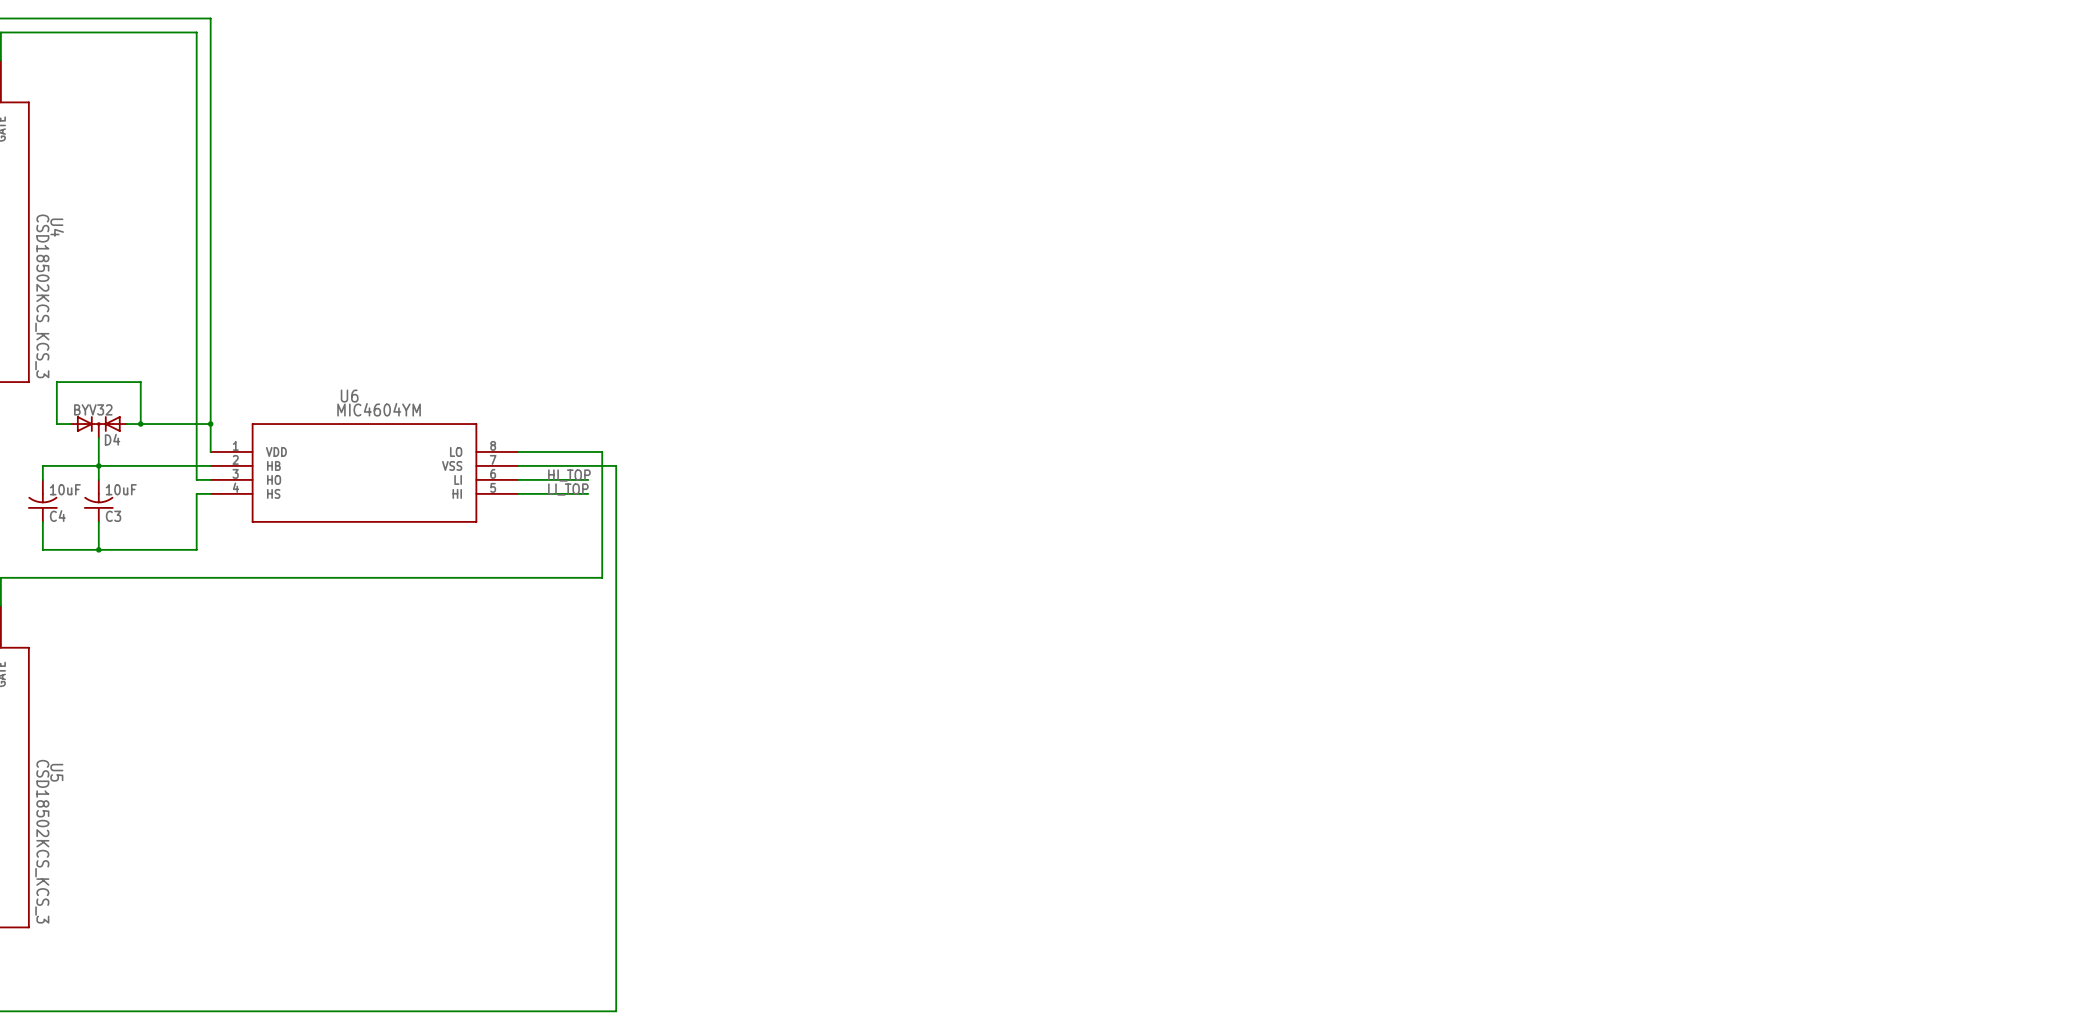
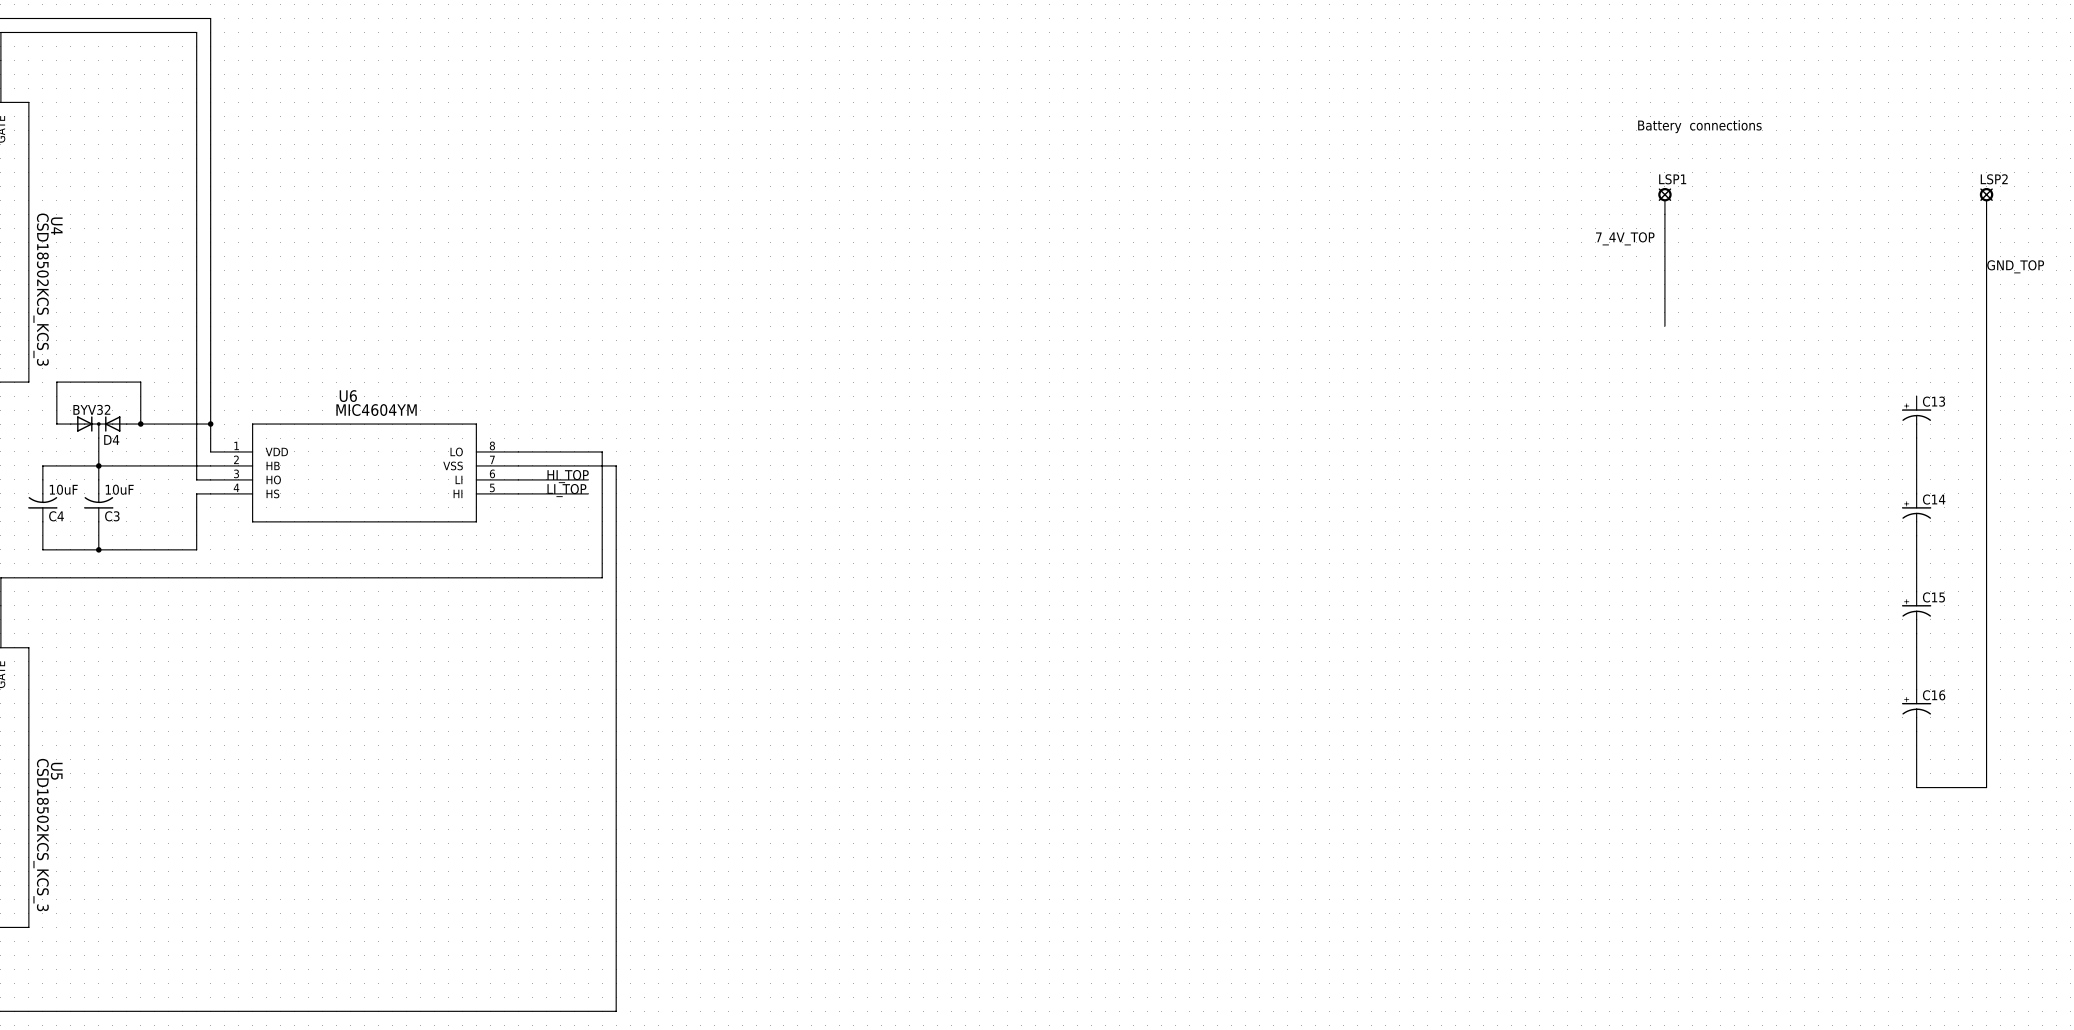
text: none -> Battery connections (1699, 126)
LSP1: none -> (1664, 201)
LSP2: none -> (1986, 201)
wire: none -> (1664, 214) (1664, 326)
wire: none -> (1986, 214) (1986, 787) (1916, 787) (1916, 731)
label: none -> 7_4V_TOP (1625, 238)
label: none -> GND_TOP (2015, 266)
C13: none -> (1916, 417)
wire: none -> (1916, 438) (1916, 493)
C14: none -> (1916, 514)
wire: none -> (1916, 535) (1916, 591)
C15: none -> (1916, 612)
wire: none -> (1916, 633) (1916, 689)
C16: none -> (1916, 710)

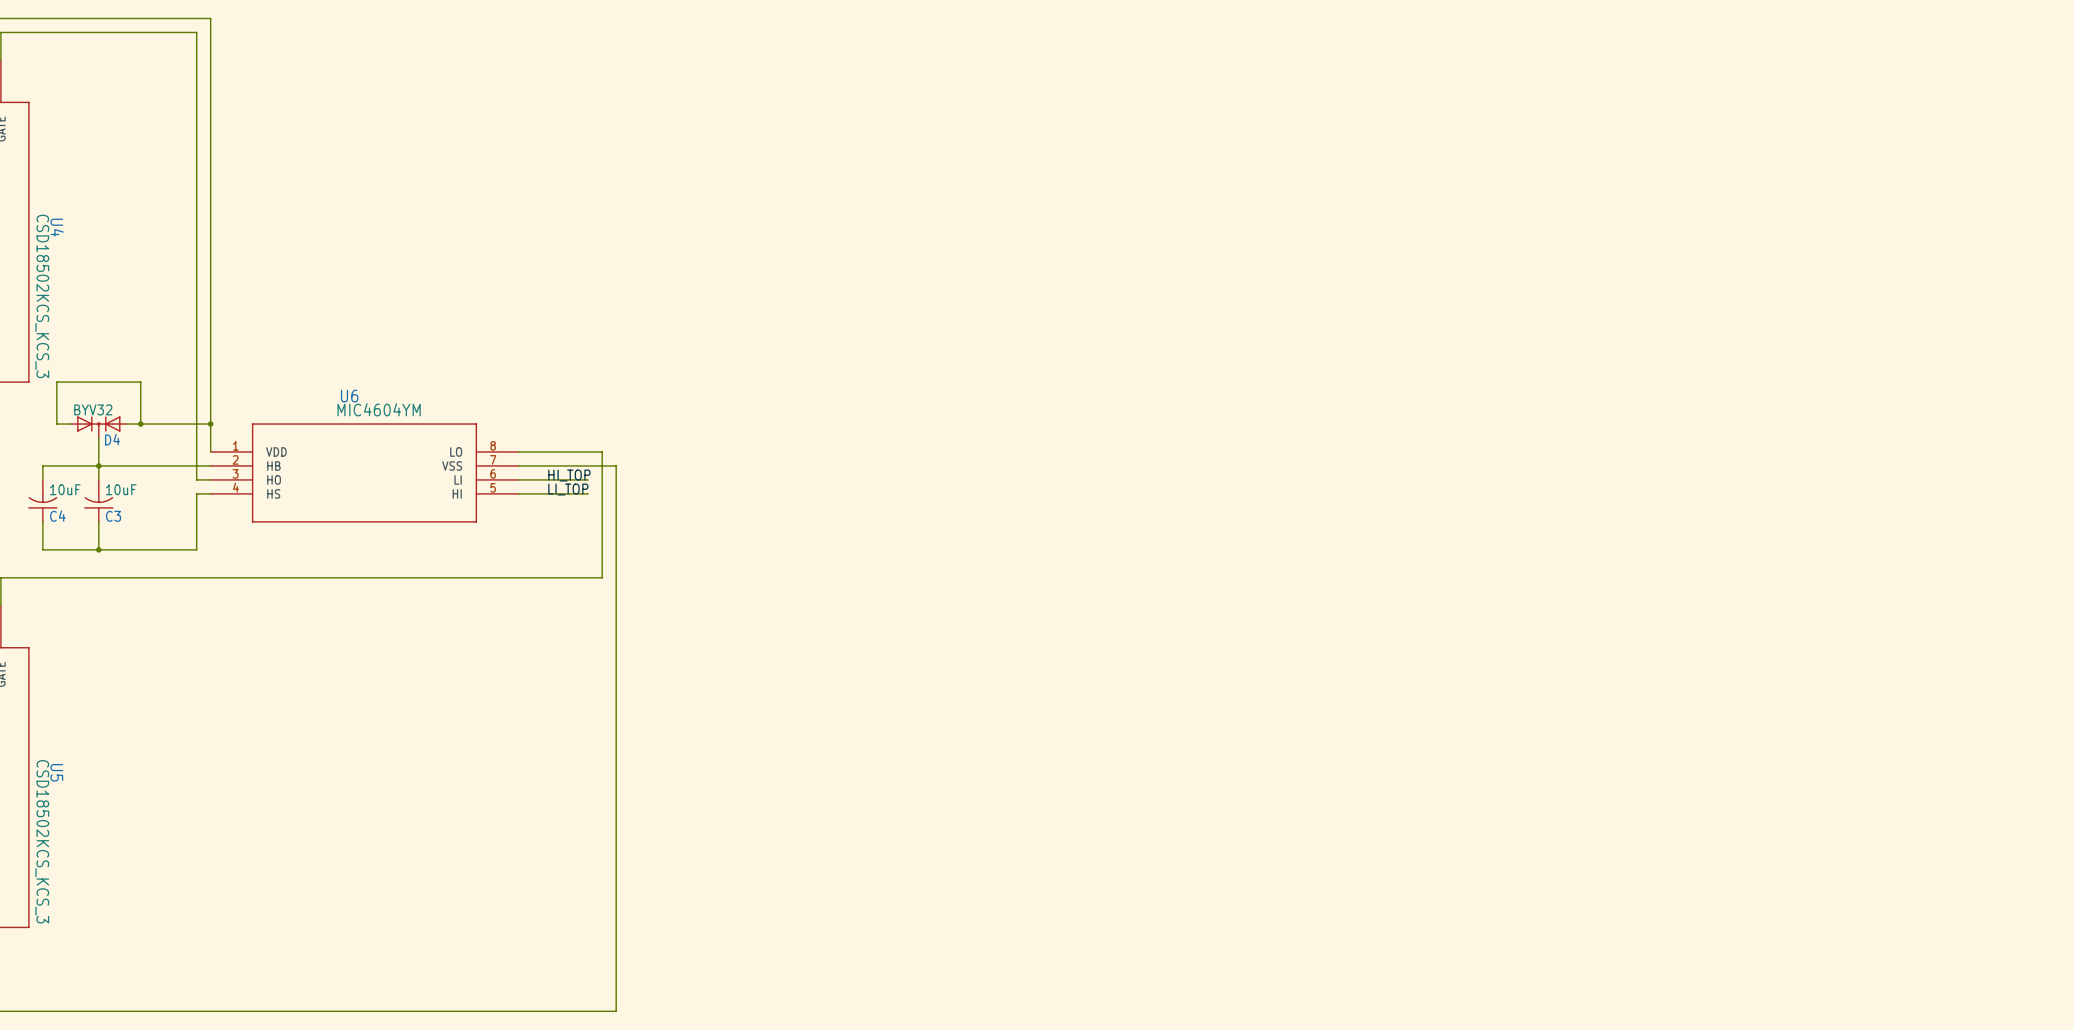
text: Battery connections (1699, 126) -> none
LSP1: (1664, 201) -> none
LSP2: (1986, 201) -> none
wire: (1664, 214) (1664, 326) -> none
wire: (1986, 214) (1986, 787) (1916, 787) (1916, 731) -> none
label: 7_4V_TOP (1625, 238) -> none
label: GND_TOP (2015, 266) -> none
C13: (1916, 417) -> none
wire: (1916, 438) (1916, 493) -> none
C14: (1916, 514) -> none
wire: (1916, 535) (1916, 591) -> none
C15: (1916, 612) -> none
wire: (1916, 633) (1916, 689) -> none
C16: (1916, 710) -> none

